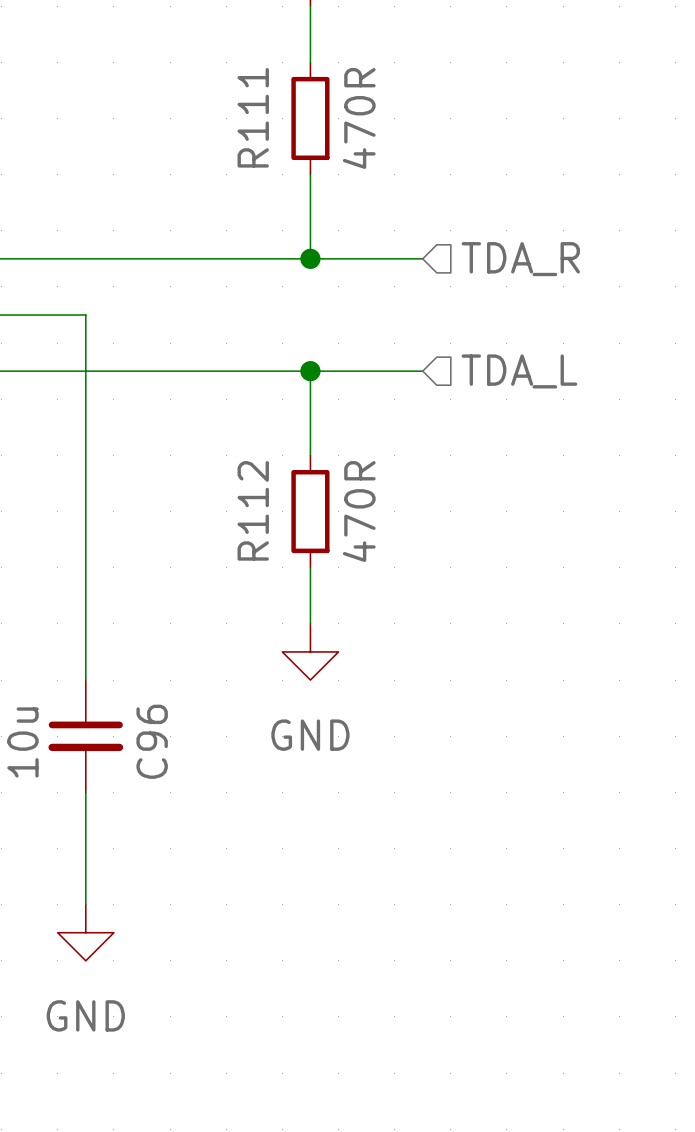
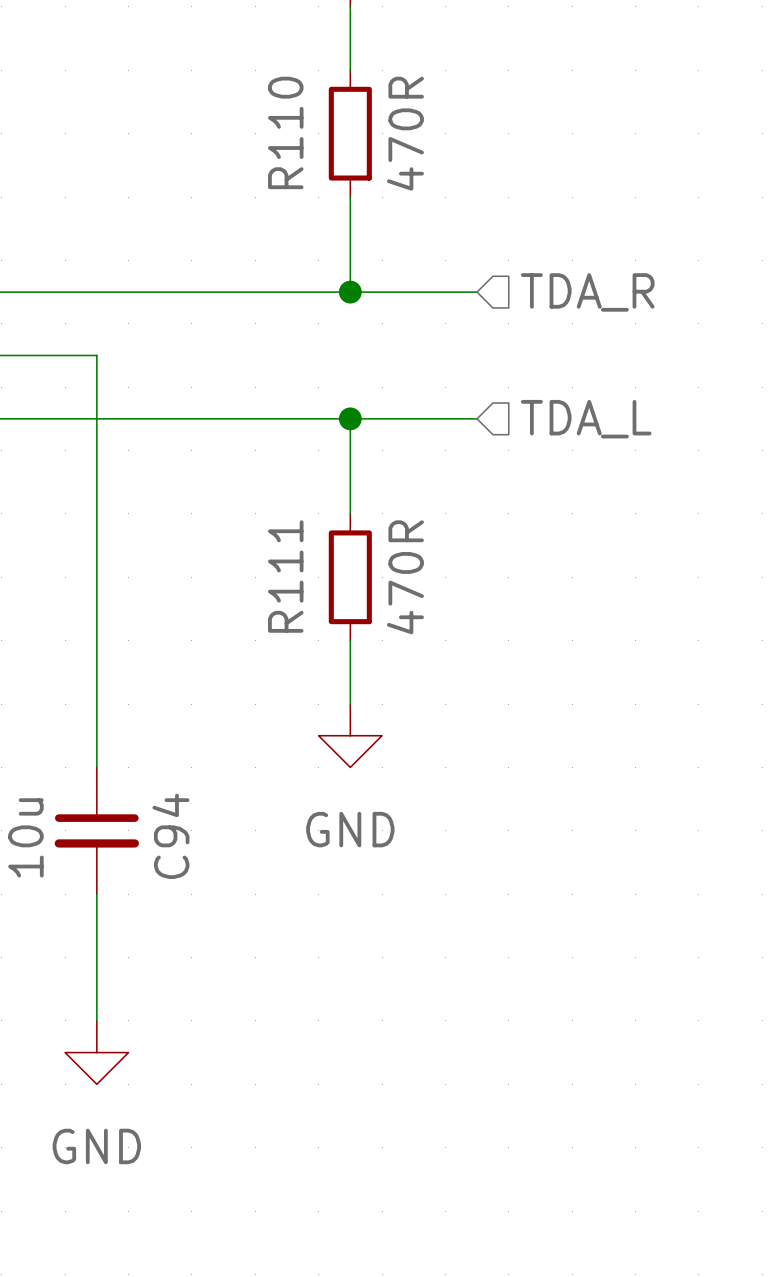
R111 name: R111 (253, 117) -> R110 (285, 132)
R112 name: R112 (253, 510) -> R111 (285, 576)
C96 name: C96 (152, 741) -> C94 (170, 836)

